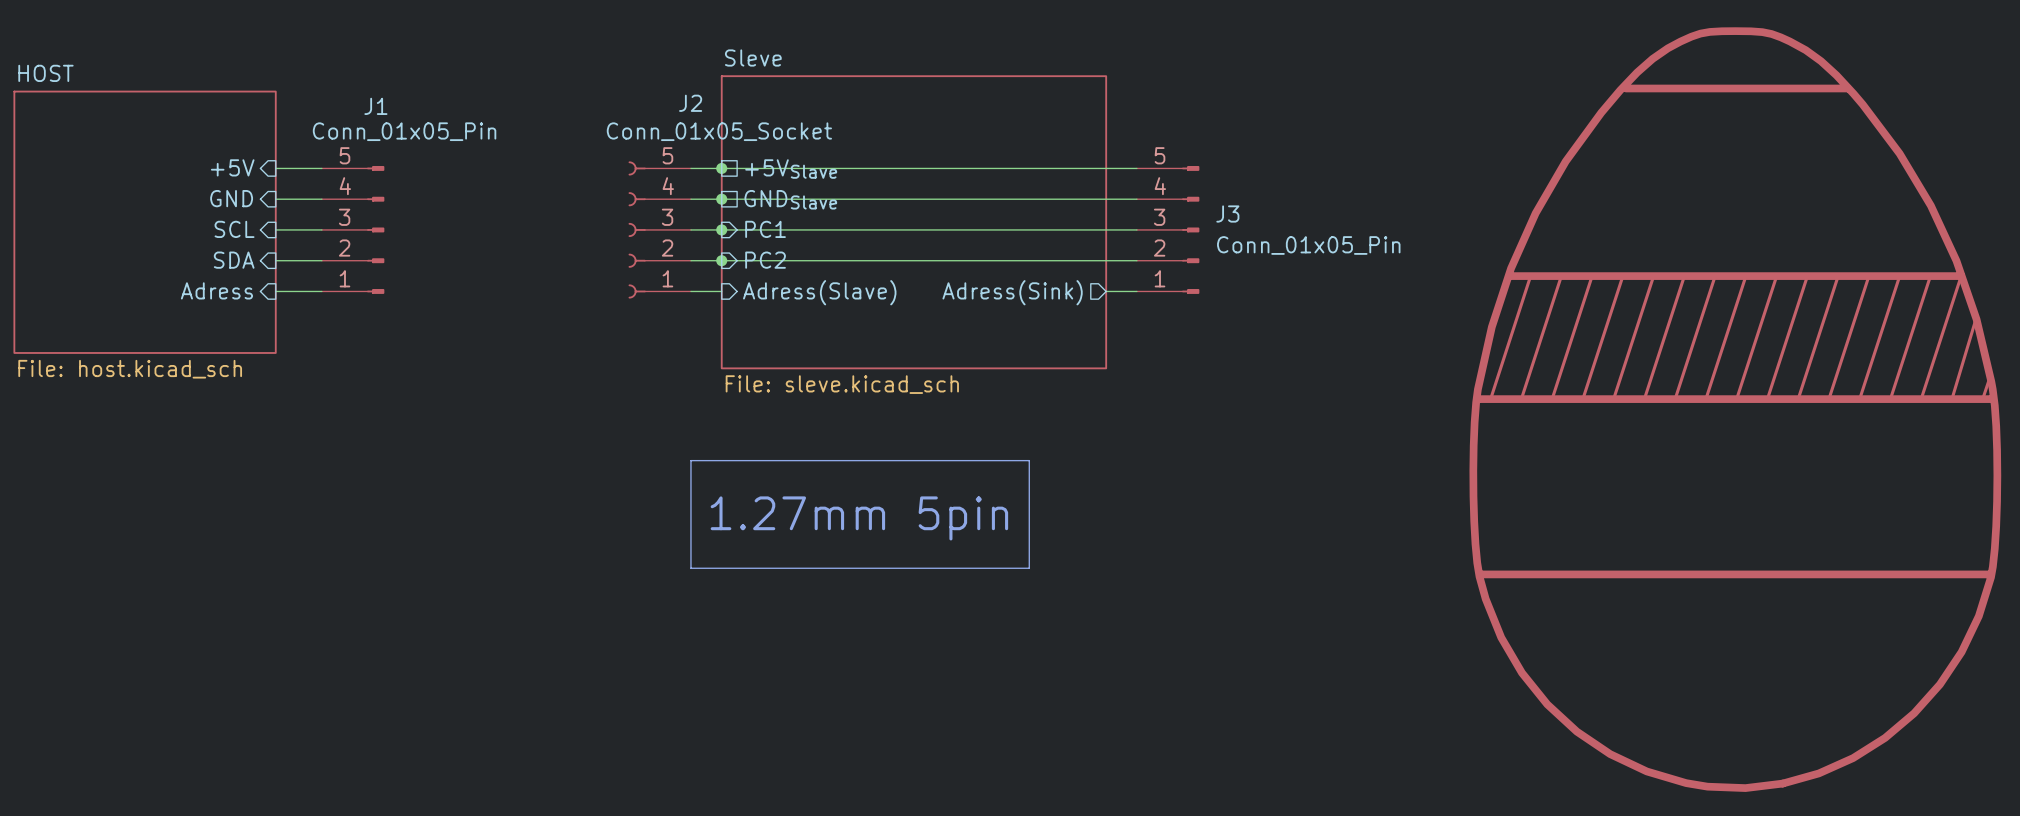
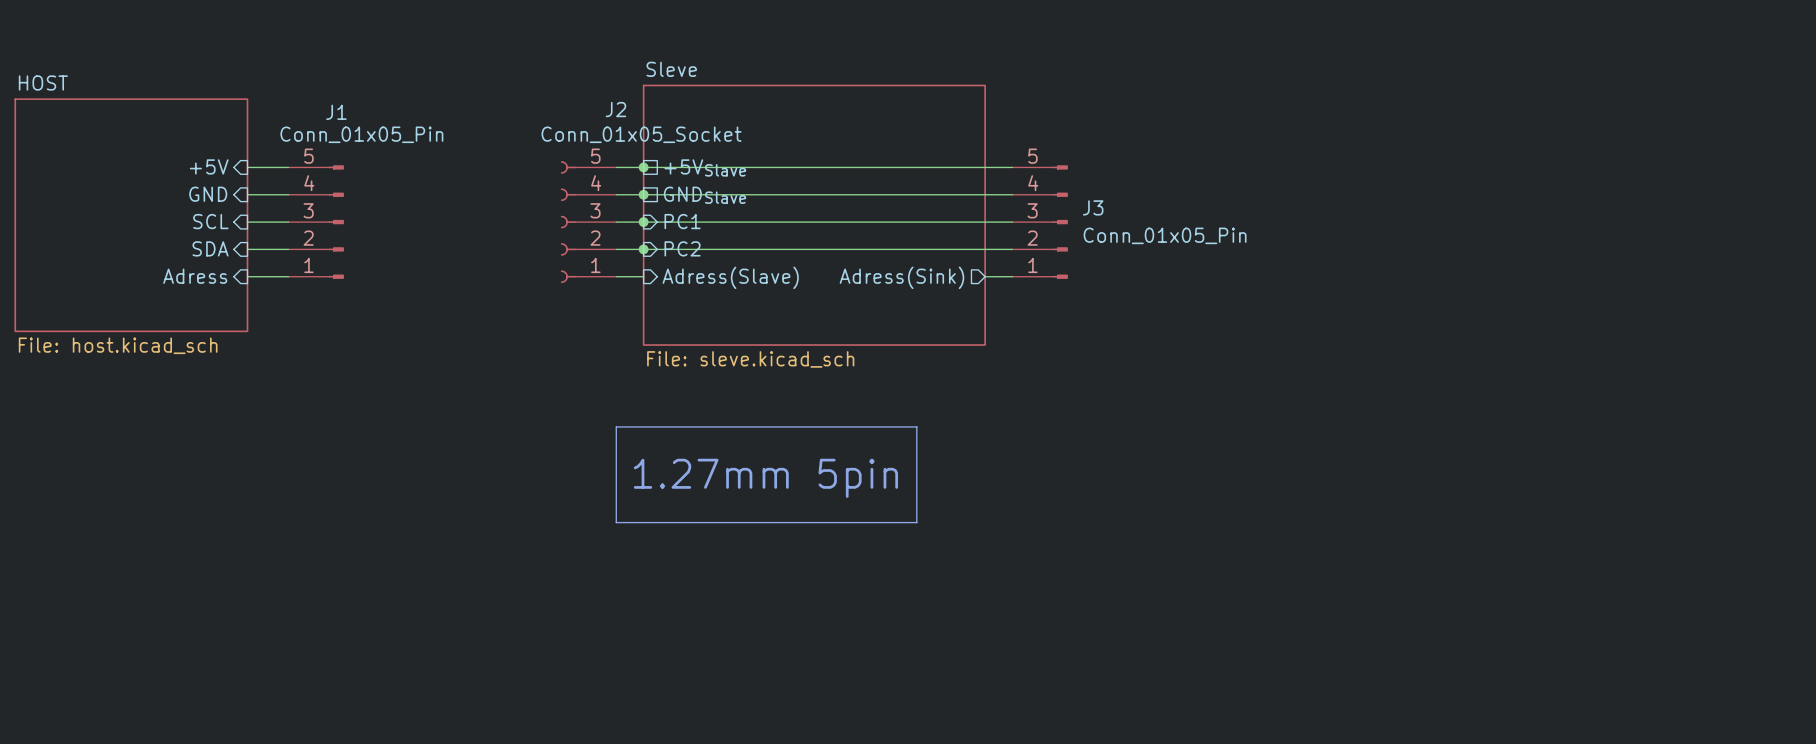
part: (1735, 409) -> none

